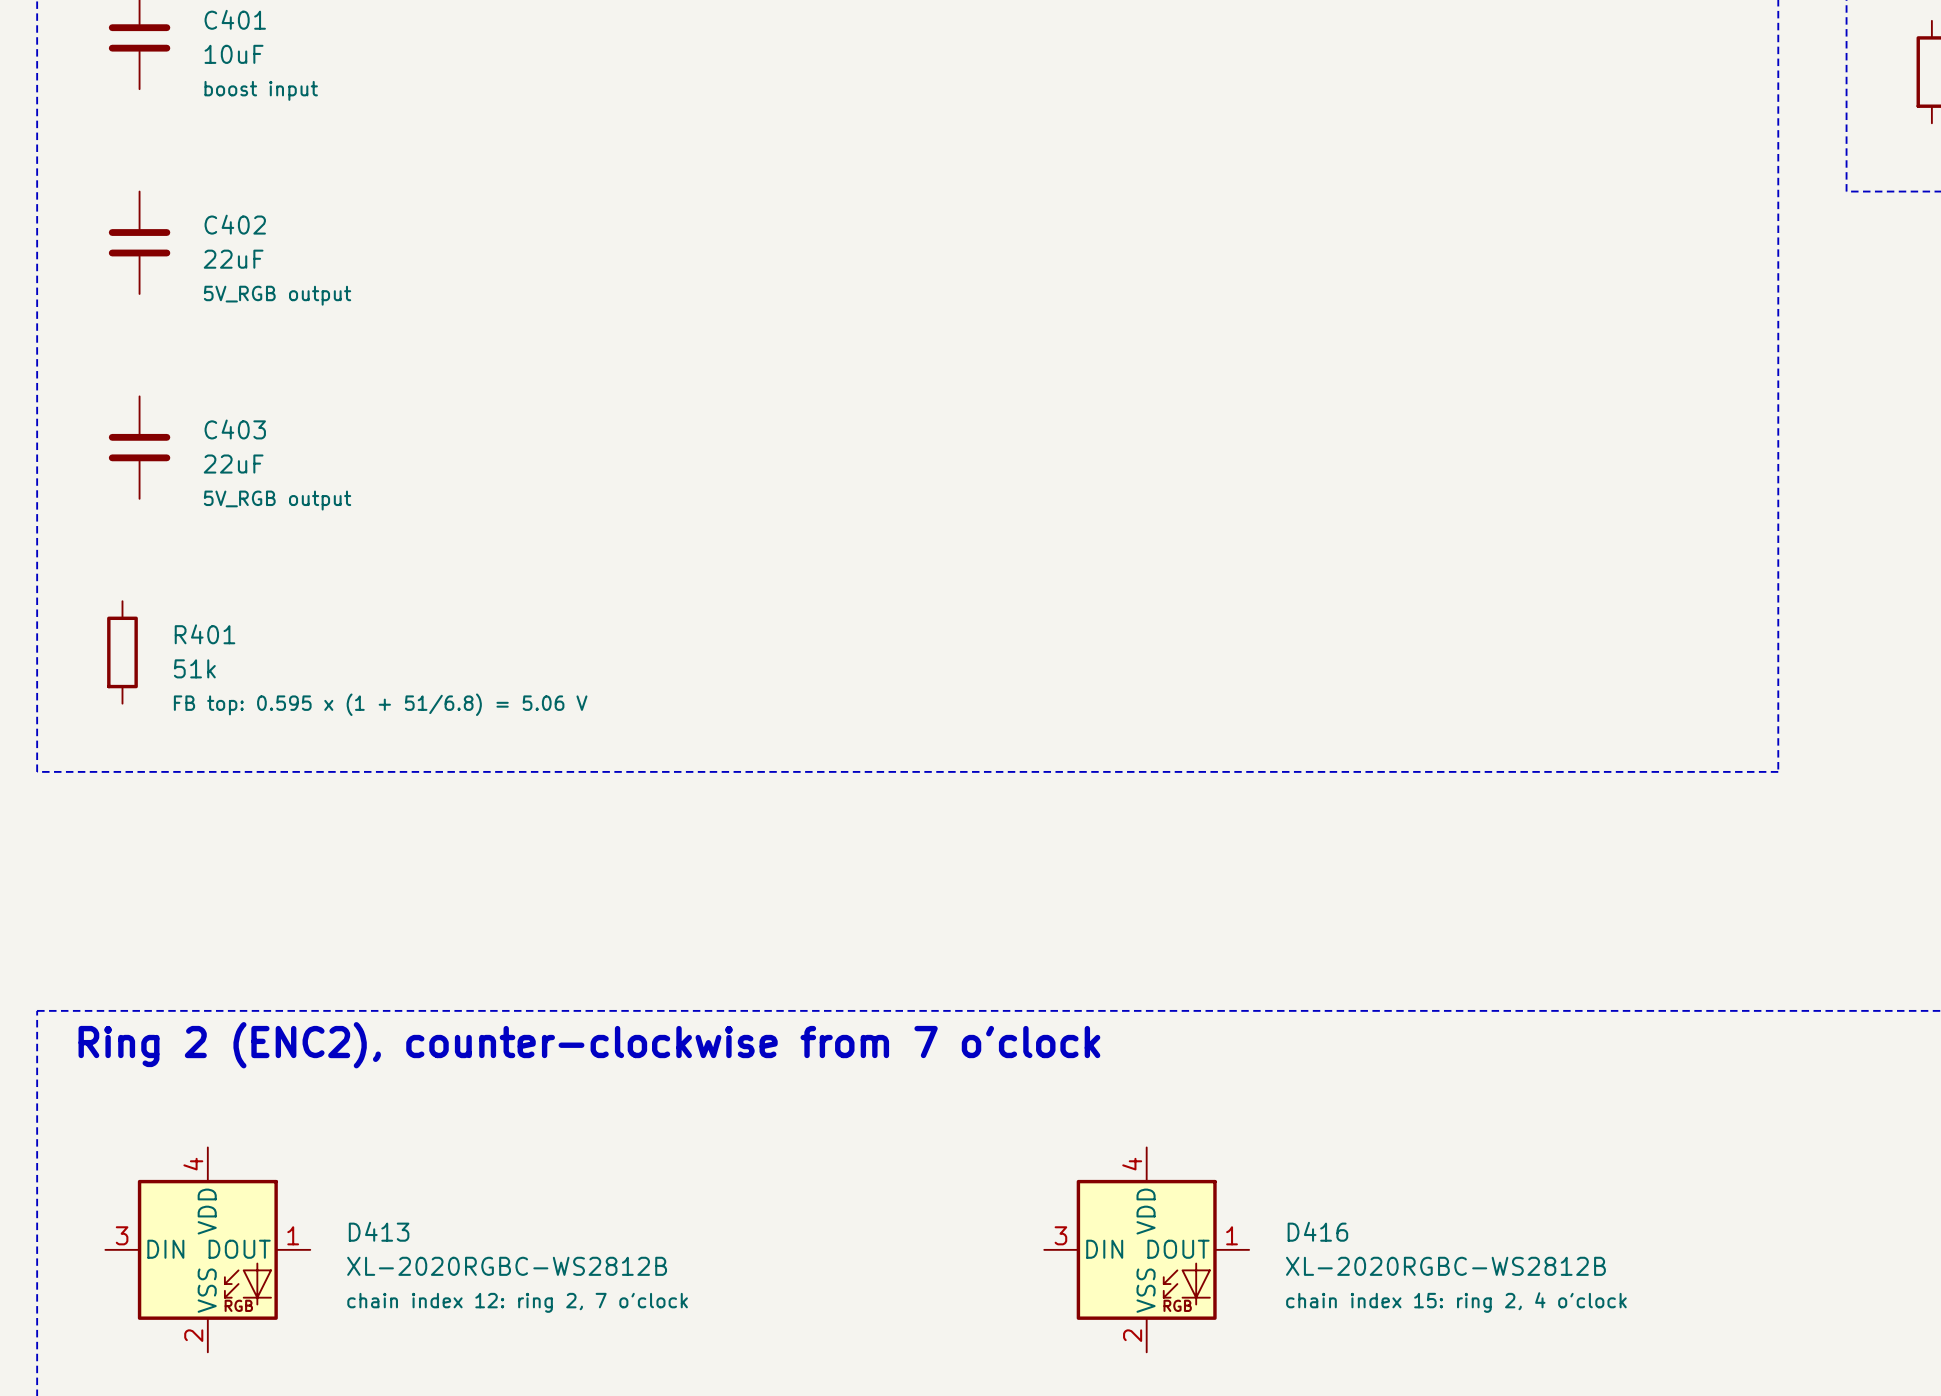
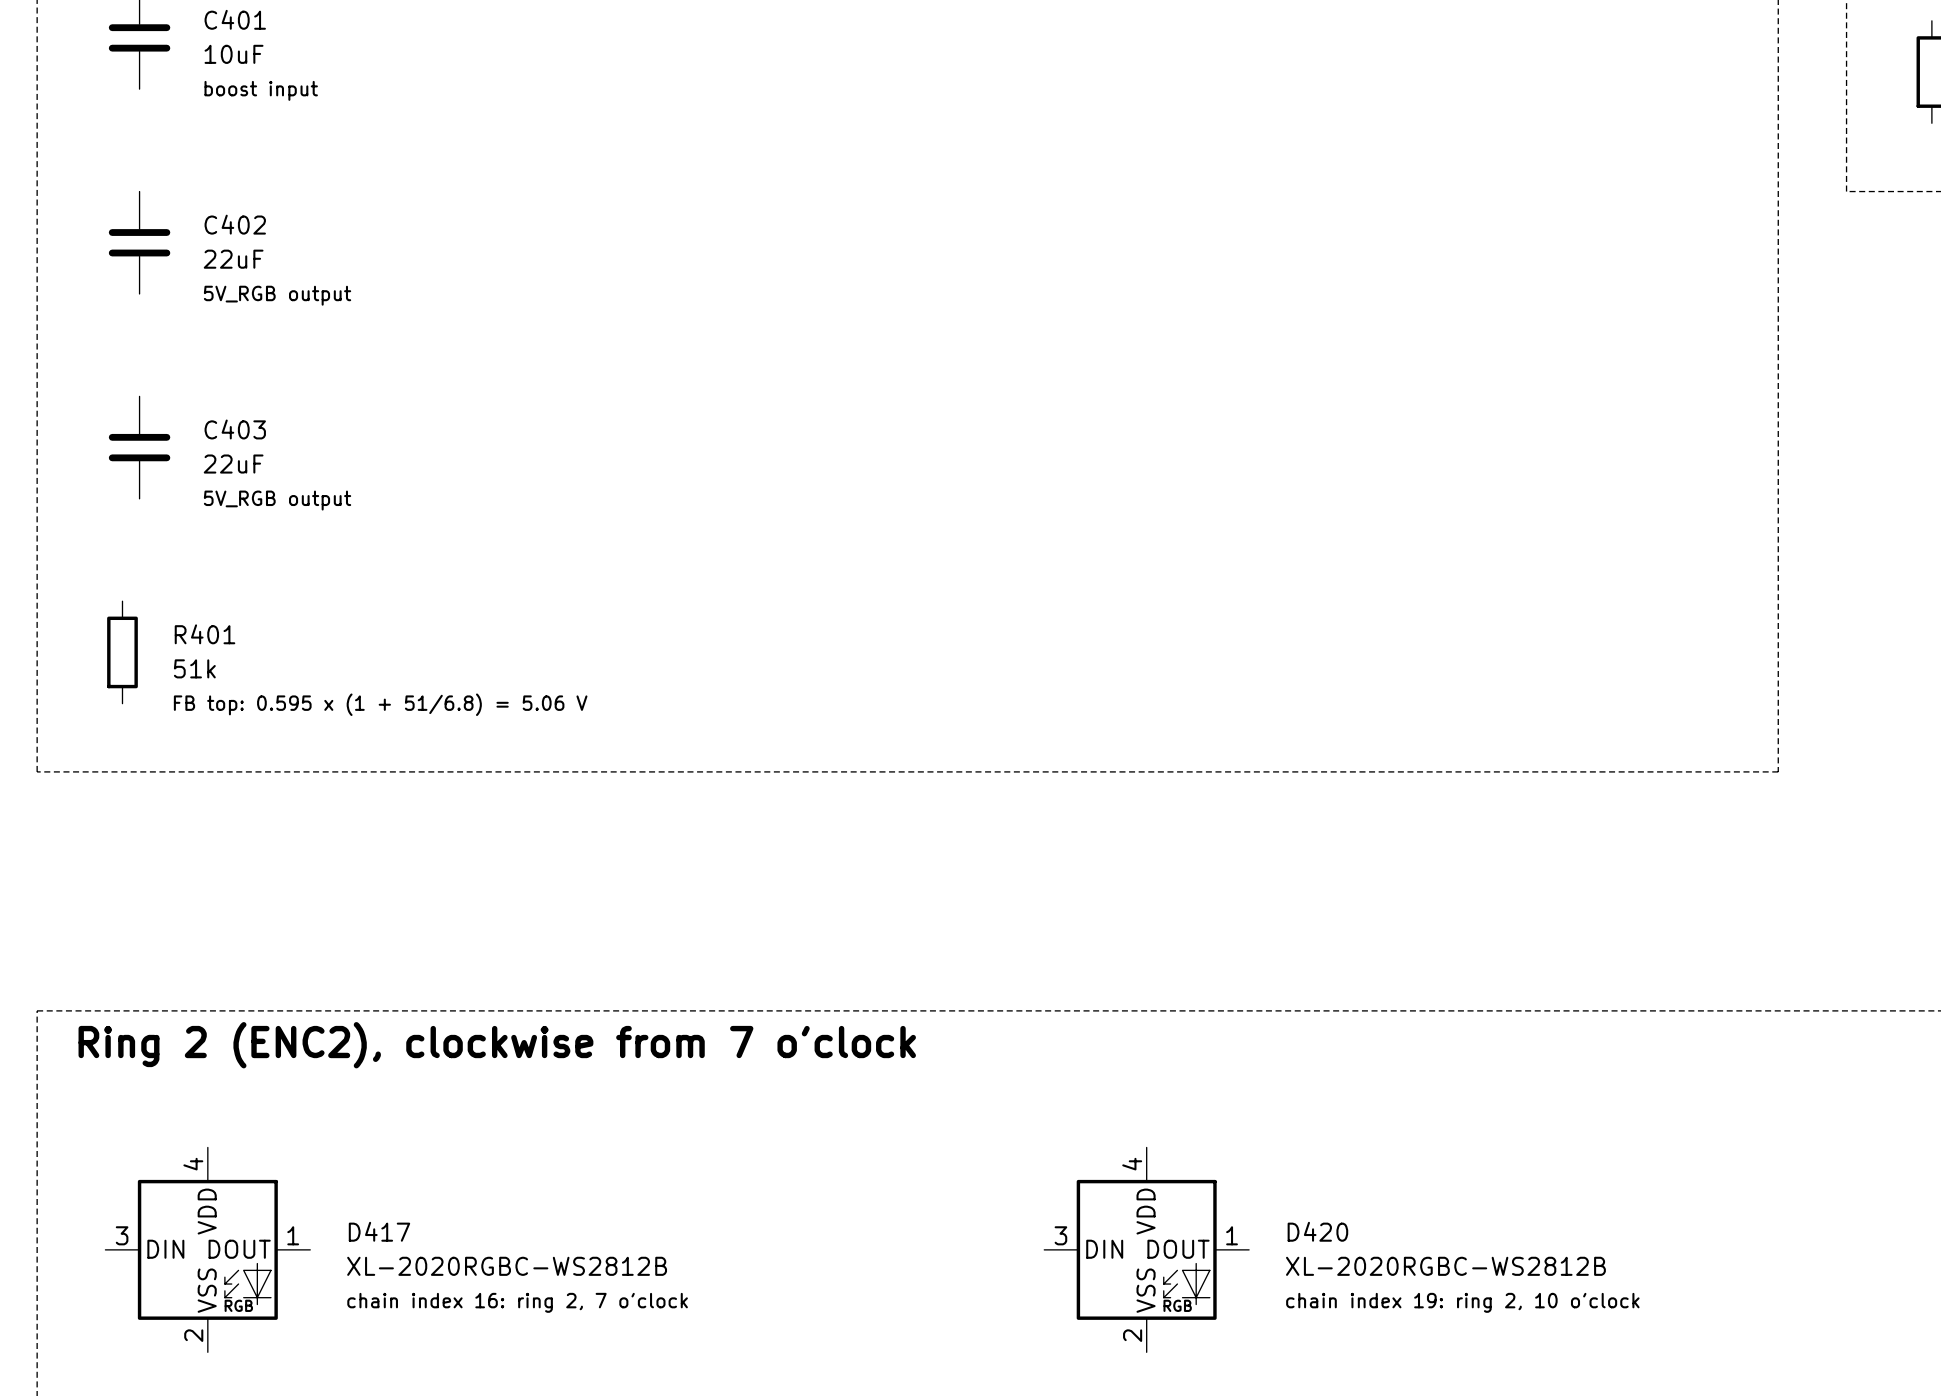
text: Ring 2 (ENC2), counter-clockwise from 7 o'clock (589, 1045) -> Ring 2 (ENC2), clockwise from 7 o'clock (497, 1045)
D413 name: D413 (379, 1231) -> D417 (379, 1231)
D416 name: D416 (1317, 1231) -> D420 (1317, 1231)
D413 text: chain index 12: ring 2, 7 o'clock (517, 1302) -> chain index 16: ring 2, 7 o'clock (517, 1302)
D416 text: chain index 15: ring 2, 4 o'clock (1456, 1302) -> chain index 19: ring 2, 10 o'clock (1462, 1302)

